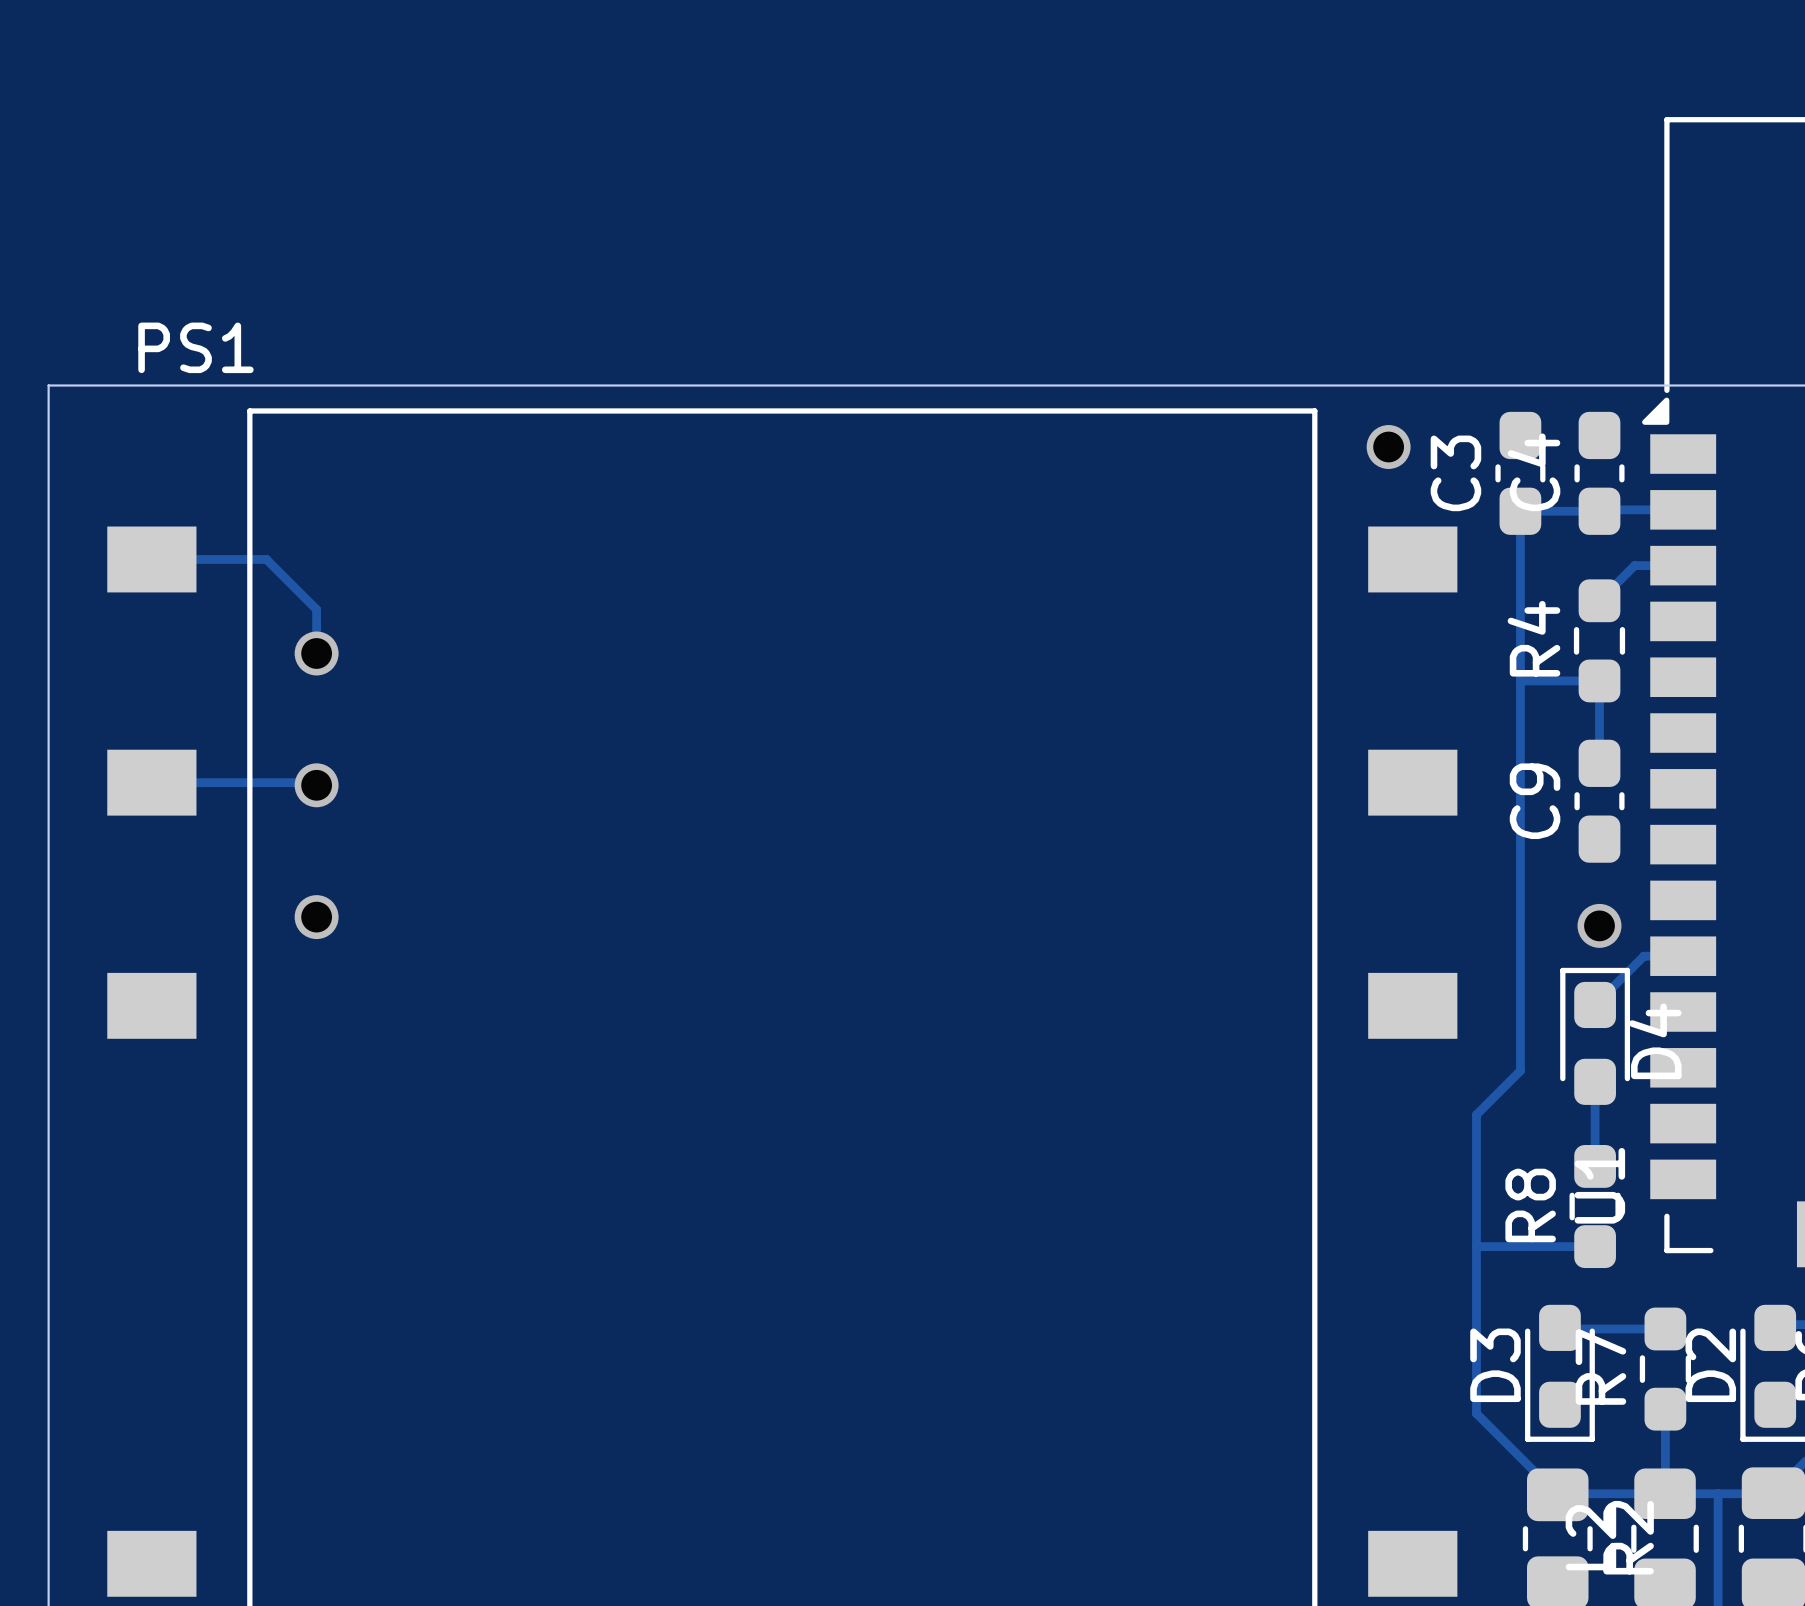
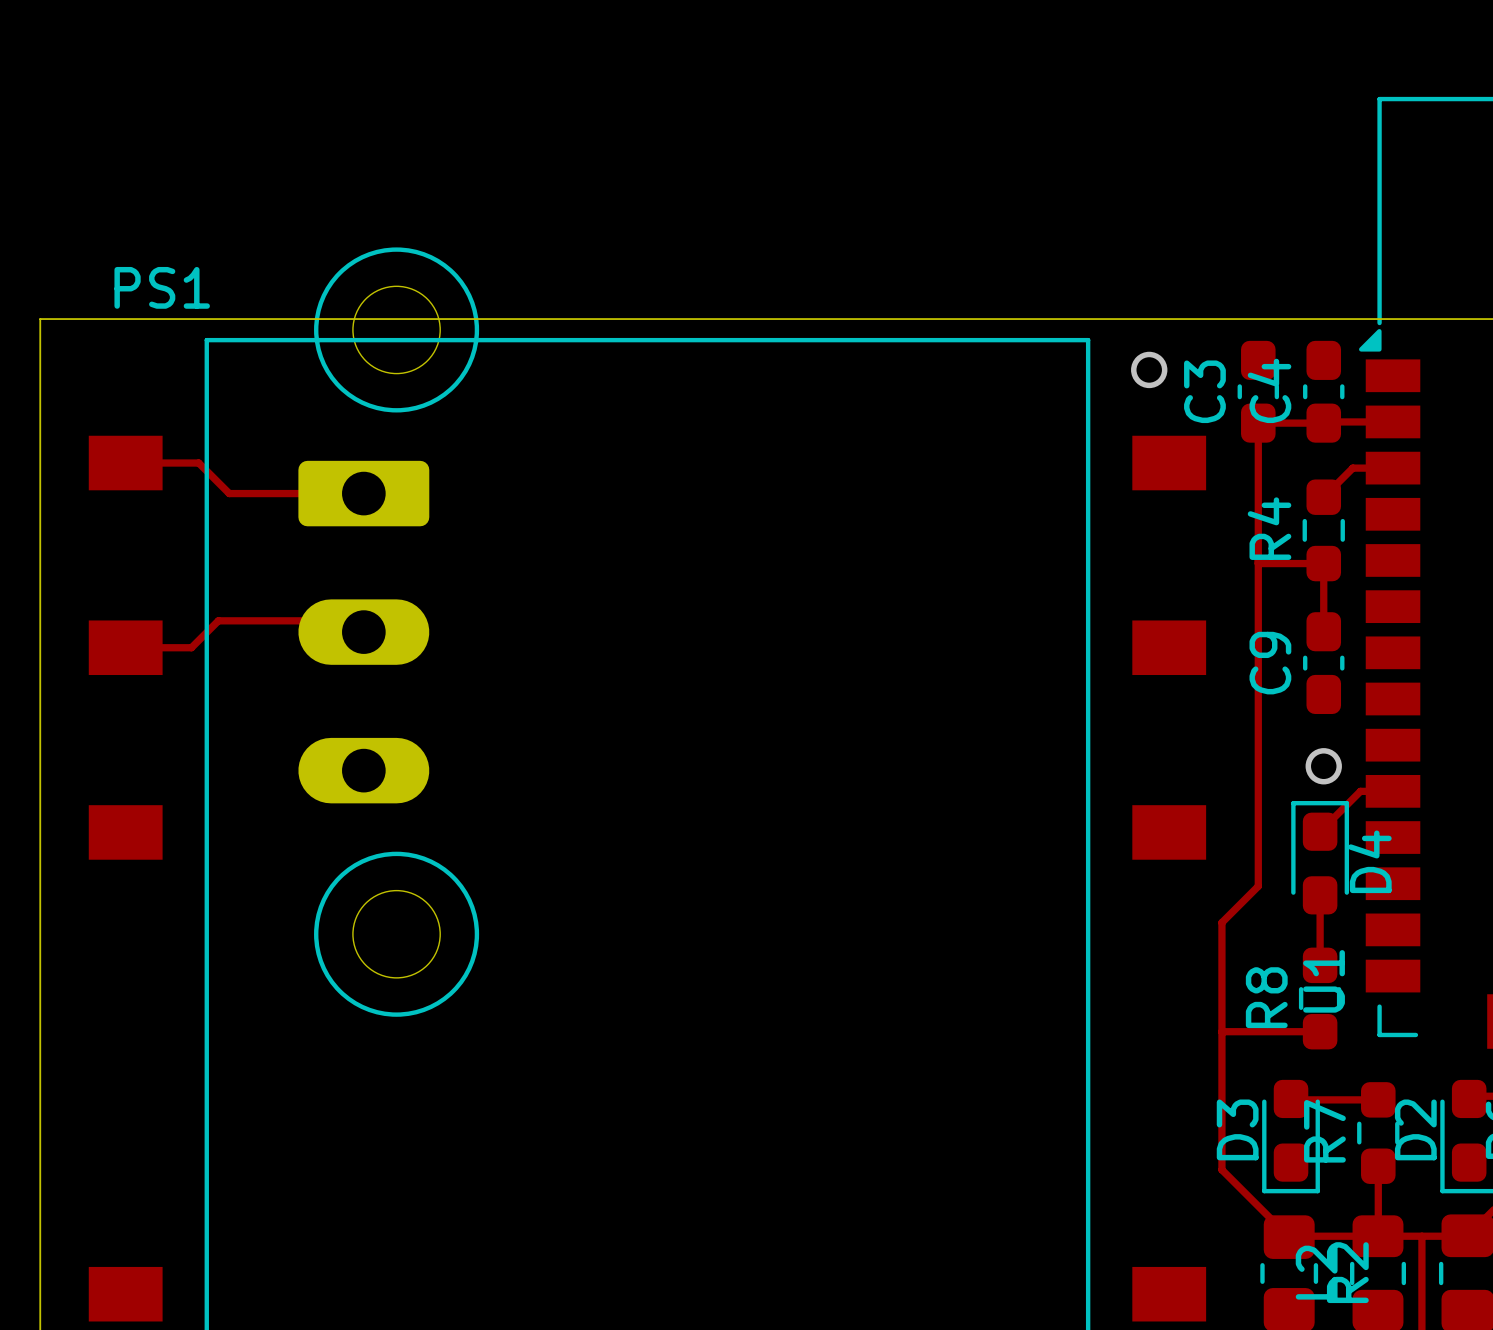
track: (240, 559) (266, 559) (316, 609) (316, 653) -> (198, 463) (229, 493) (363, 493)
via: (316, 653) -> none
part: none -> (388, 632)
track: (231, 782) (313, 782) (316, 785) -> (191, 647) (218, 620) (363, 620)
via: (316, 785) -> none
via: (316, 917) -> none

